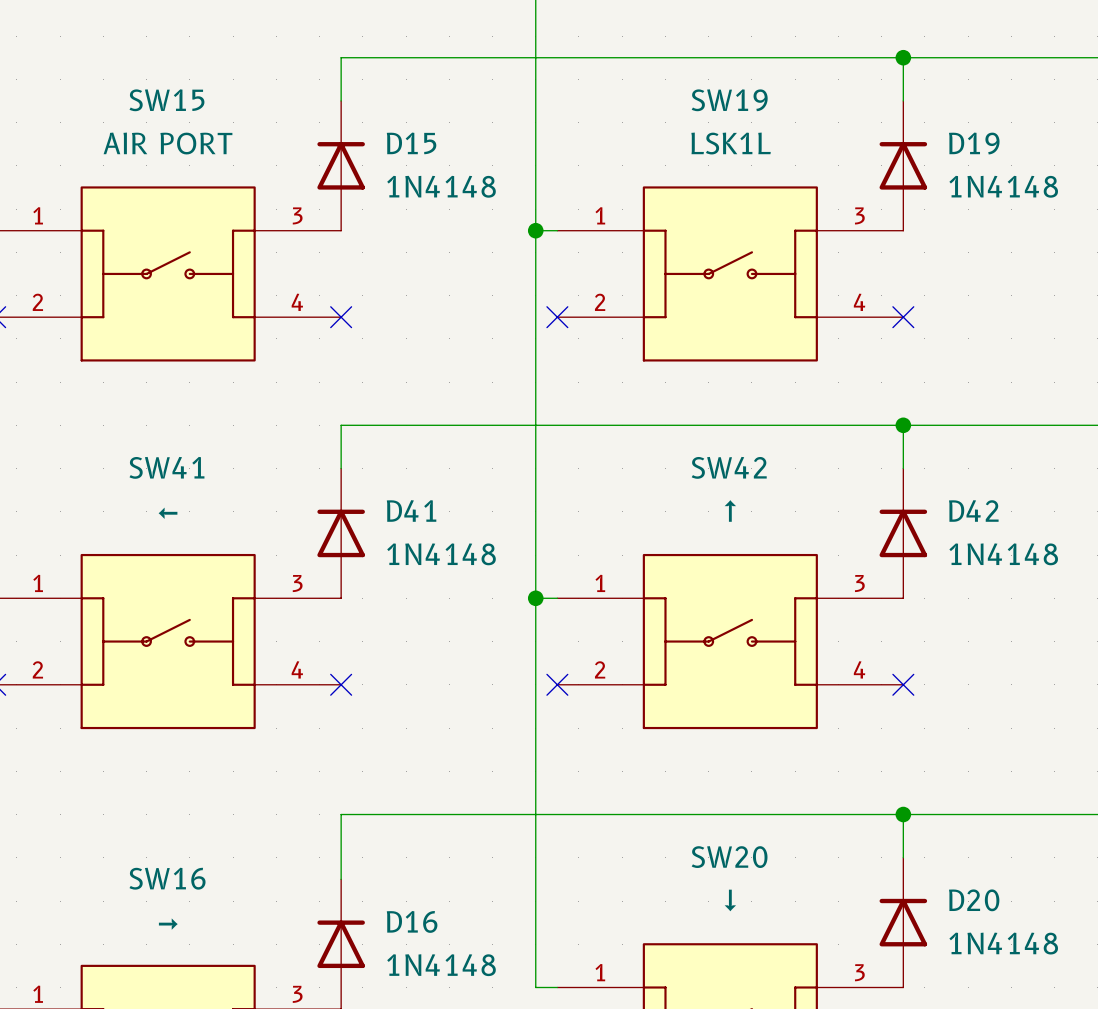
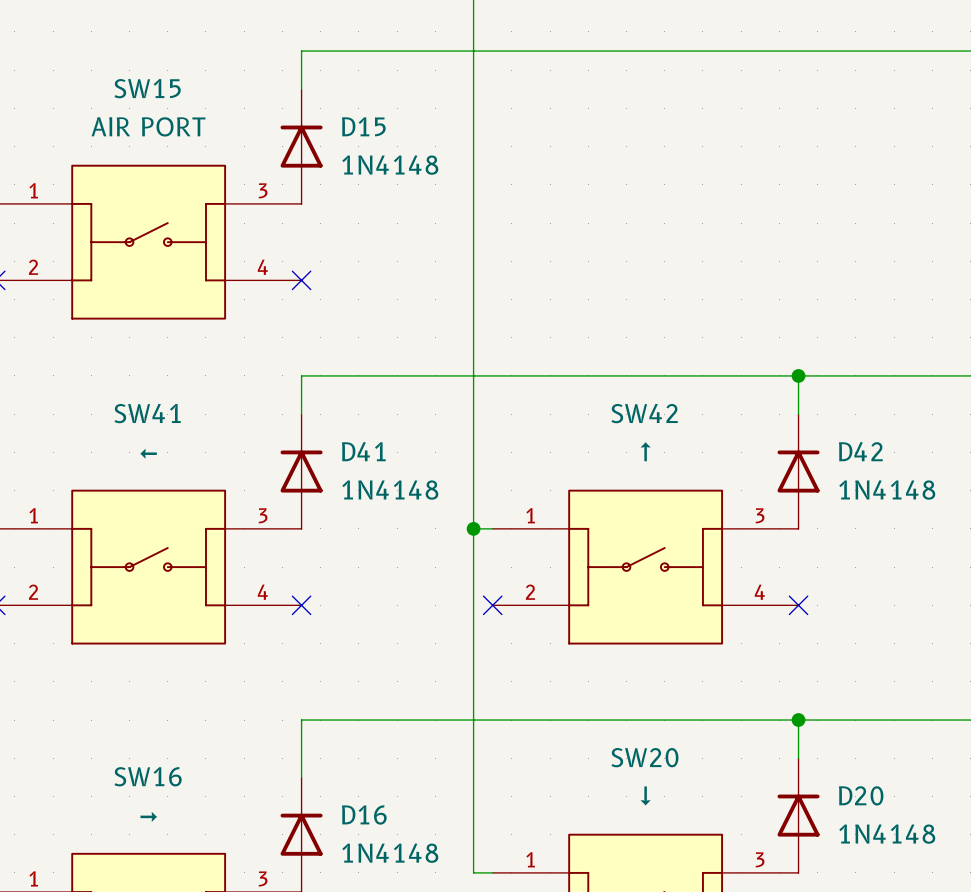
wire: (903, 57) (903, 100) -> none
junction: (903, 57) -> none
D19: 1N4148 (903, 165) -> none
wire: (535, 230) (557, 230) -> none
junction: (535, 230) -> none
SW19: LSK1L (730, 273) -> none
no-connect mark: (557, 317) -> none
no-connect mark: (903, 317) -> none

